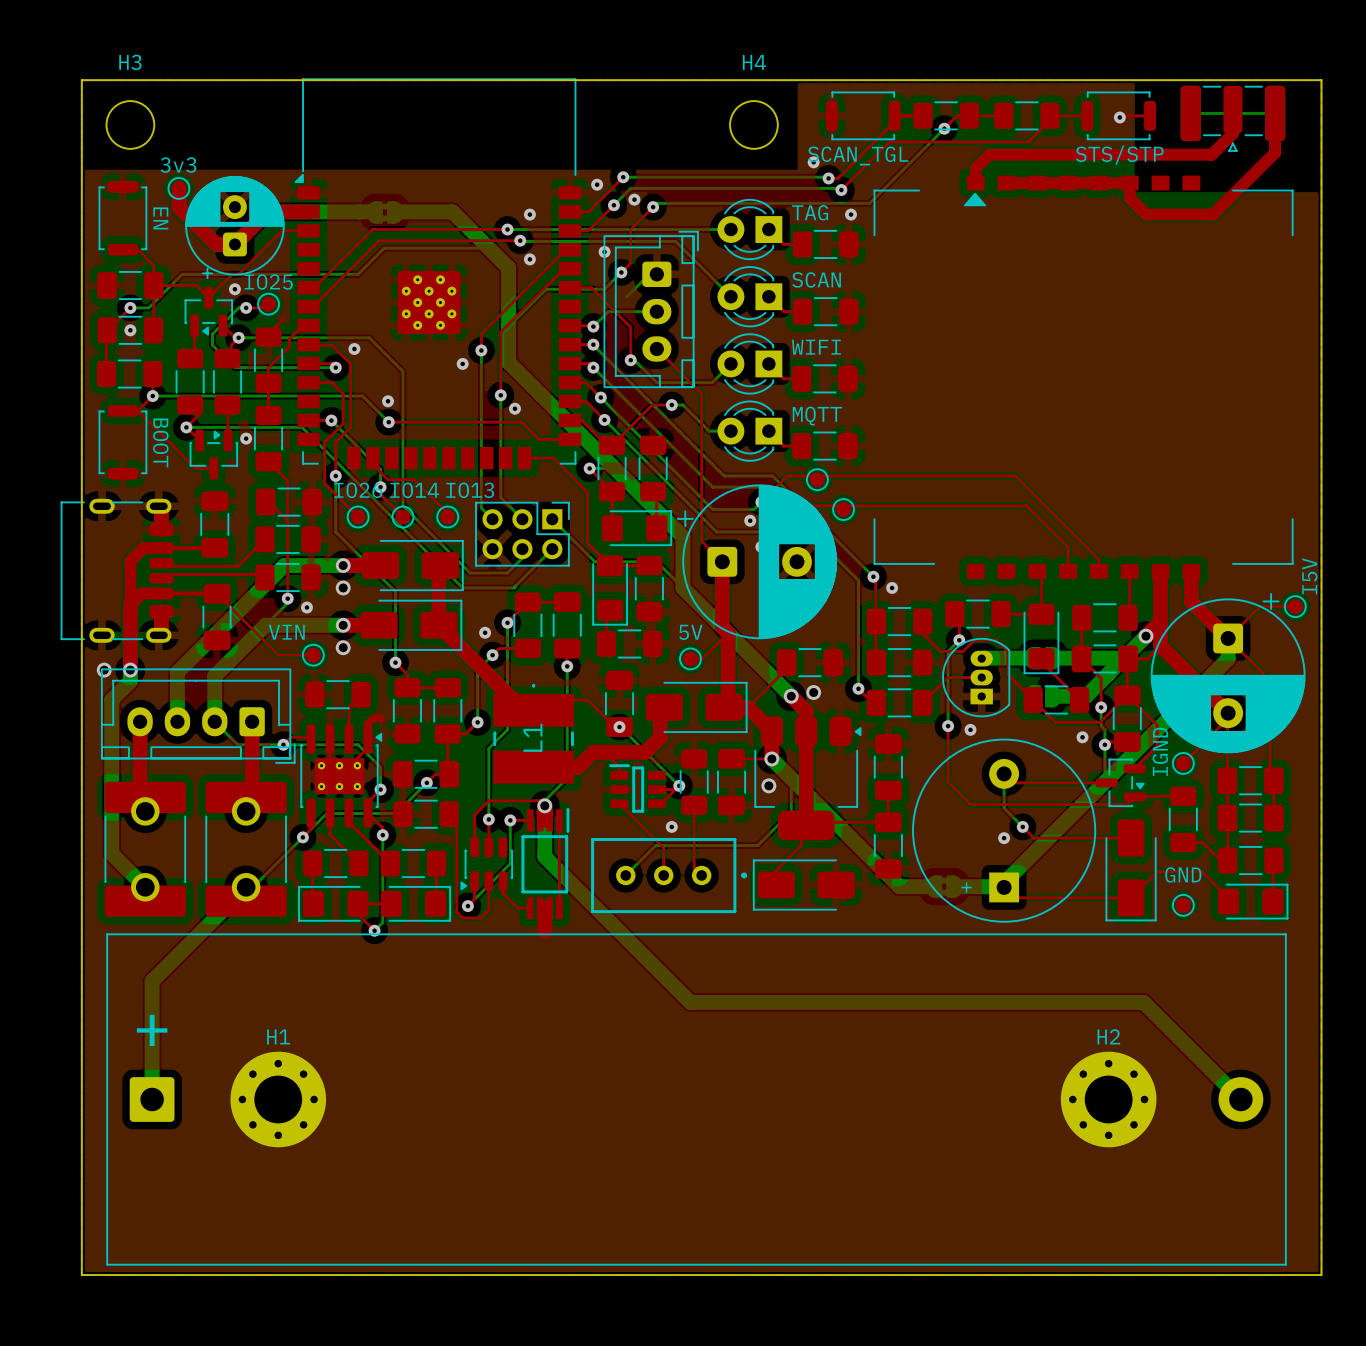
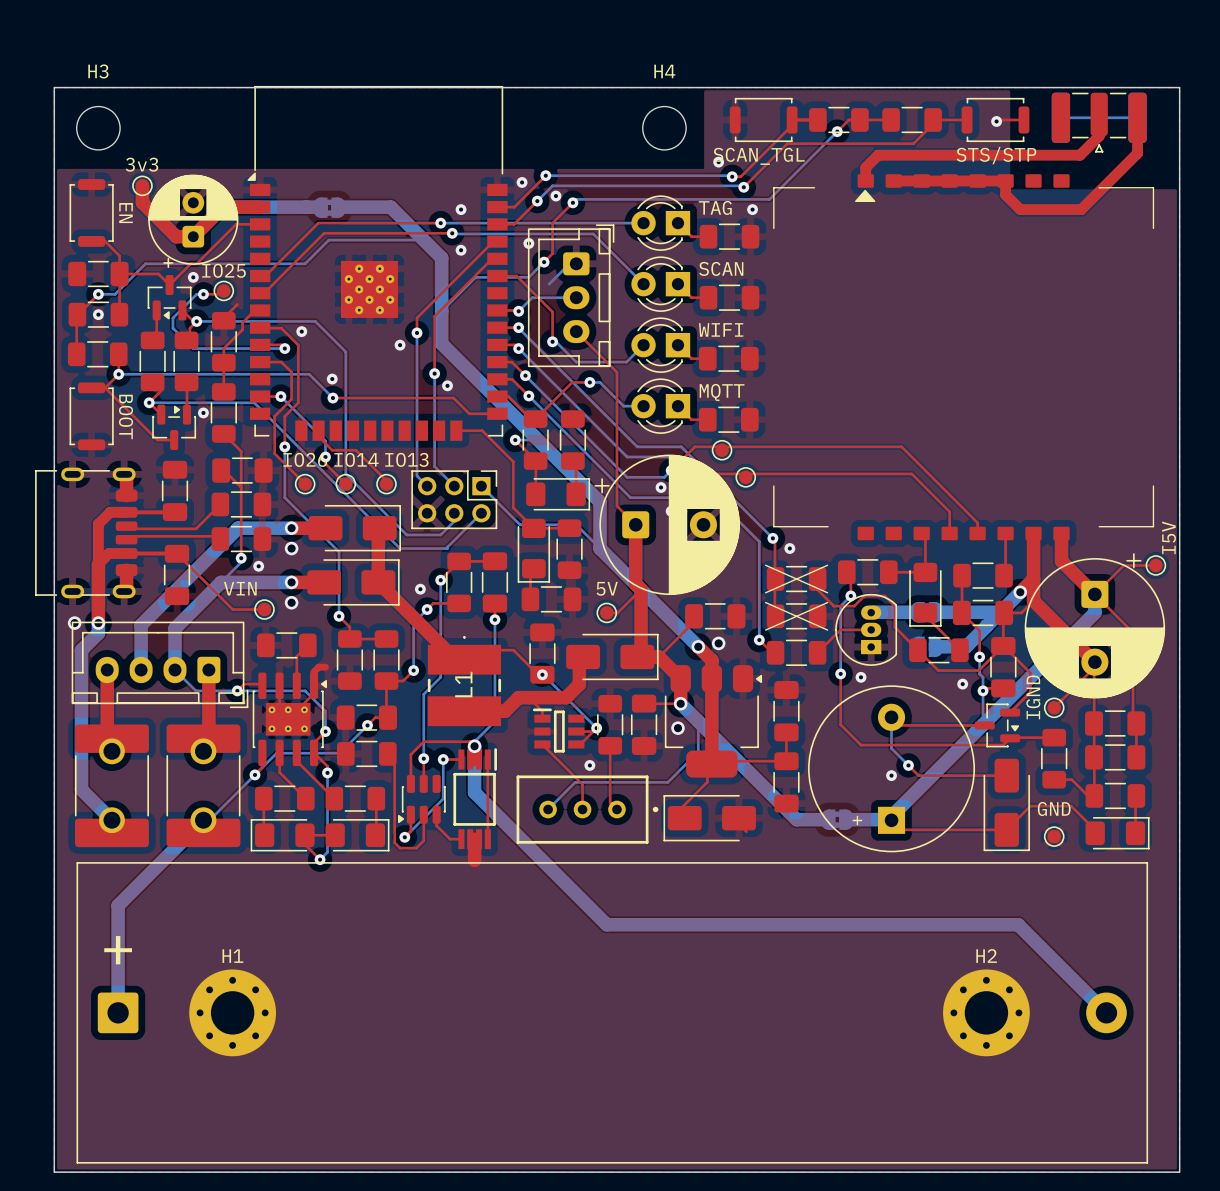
part footprint: [866, 607, 933, 637] -> [764, 564, 829, 594]
part footprint: [866, 648, 933, 678] -> [764, 601, 829, 631]

